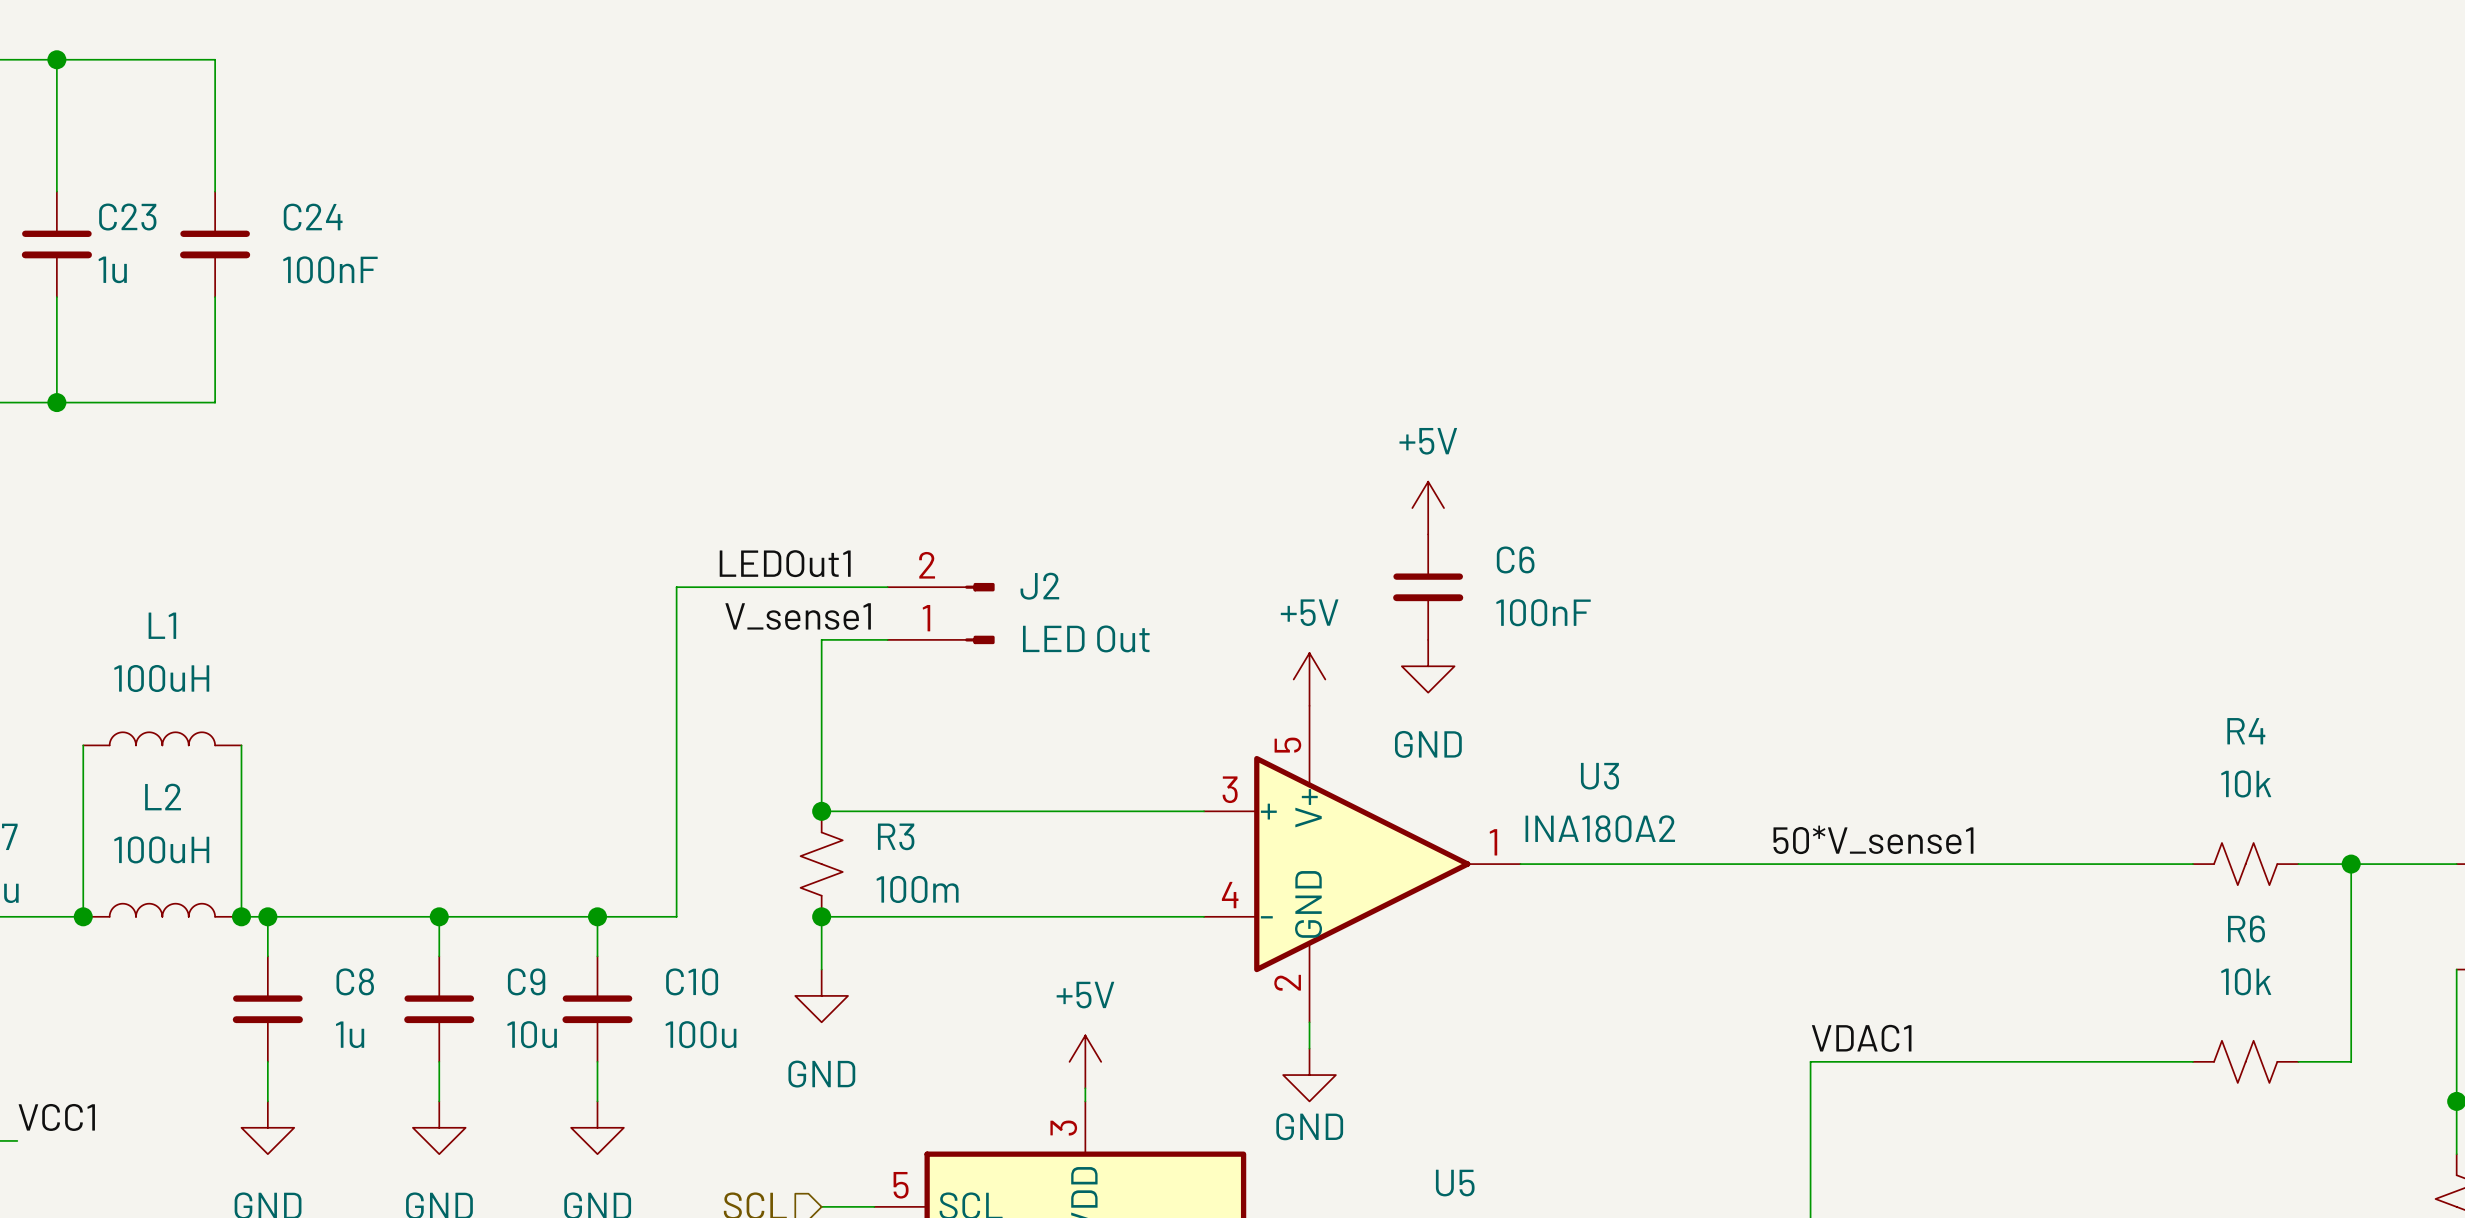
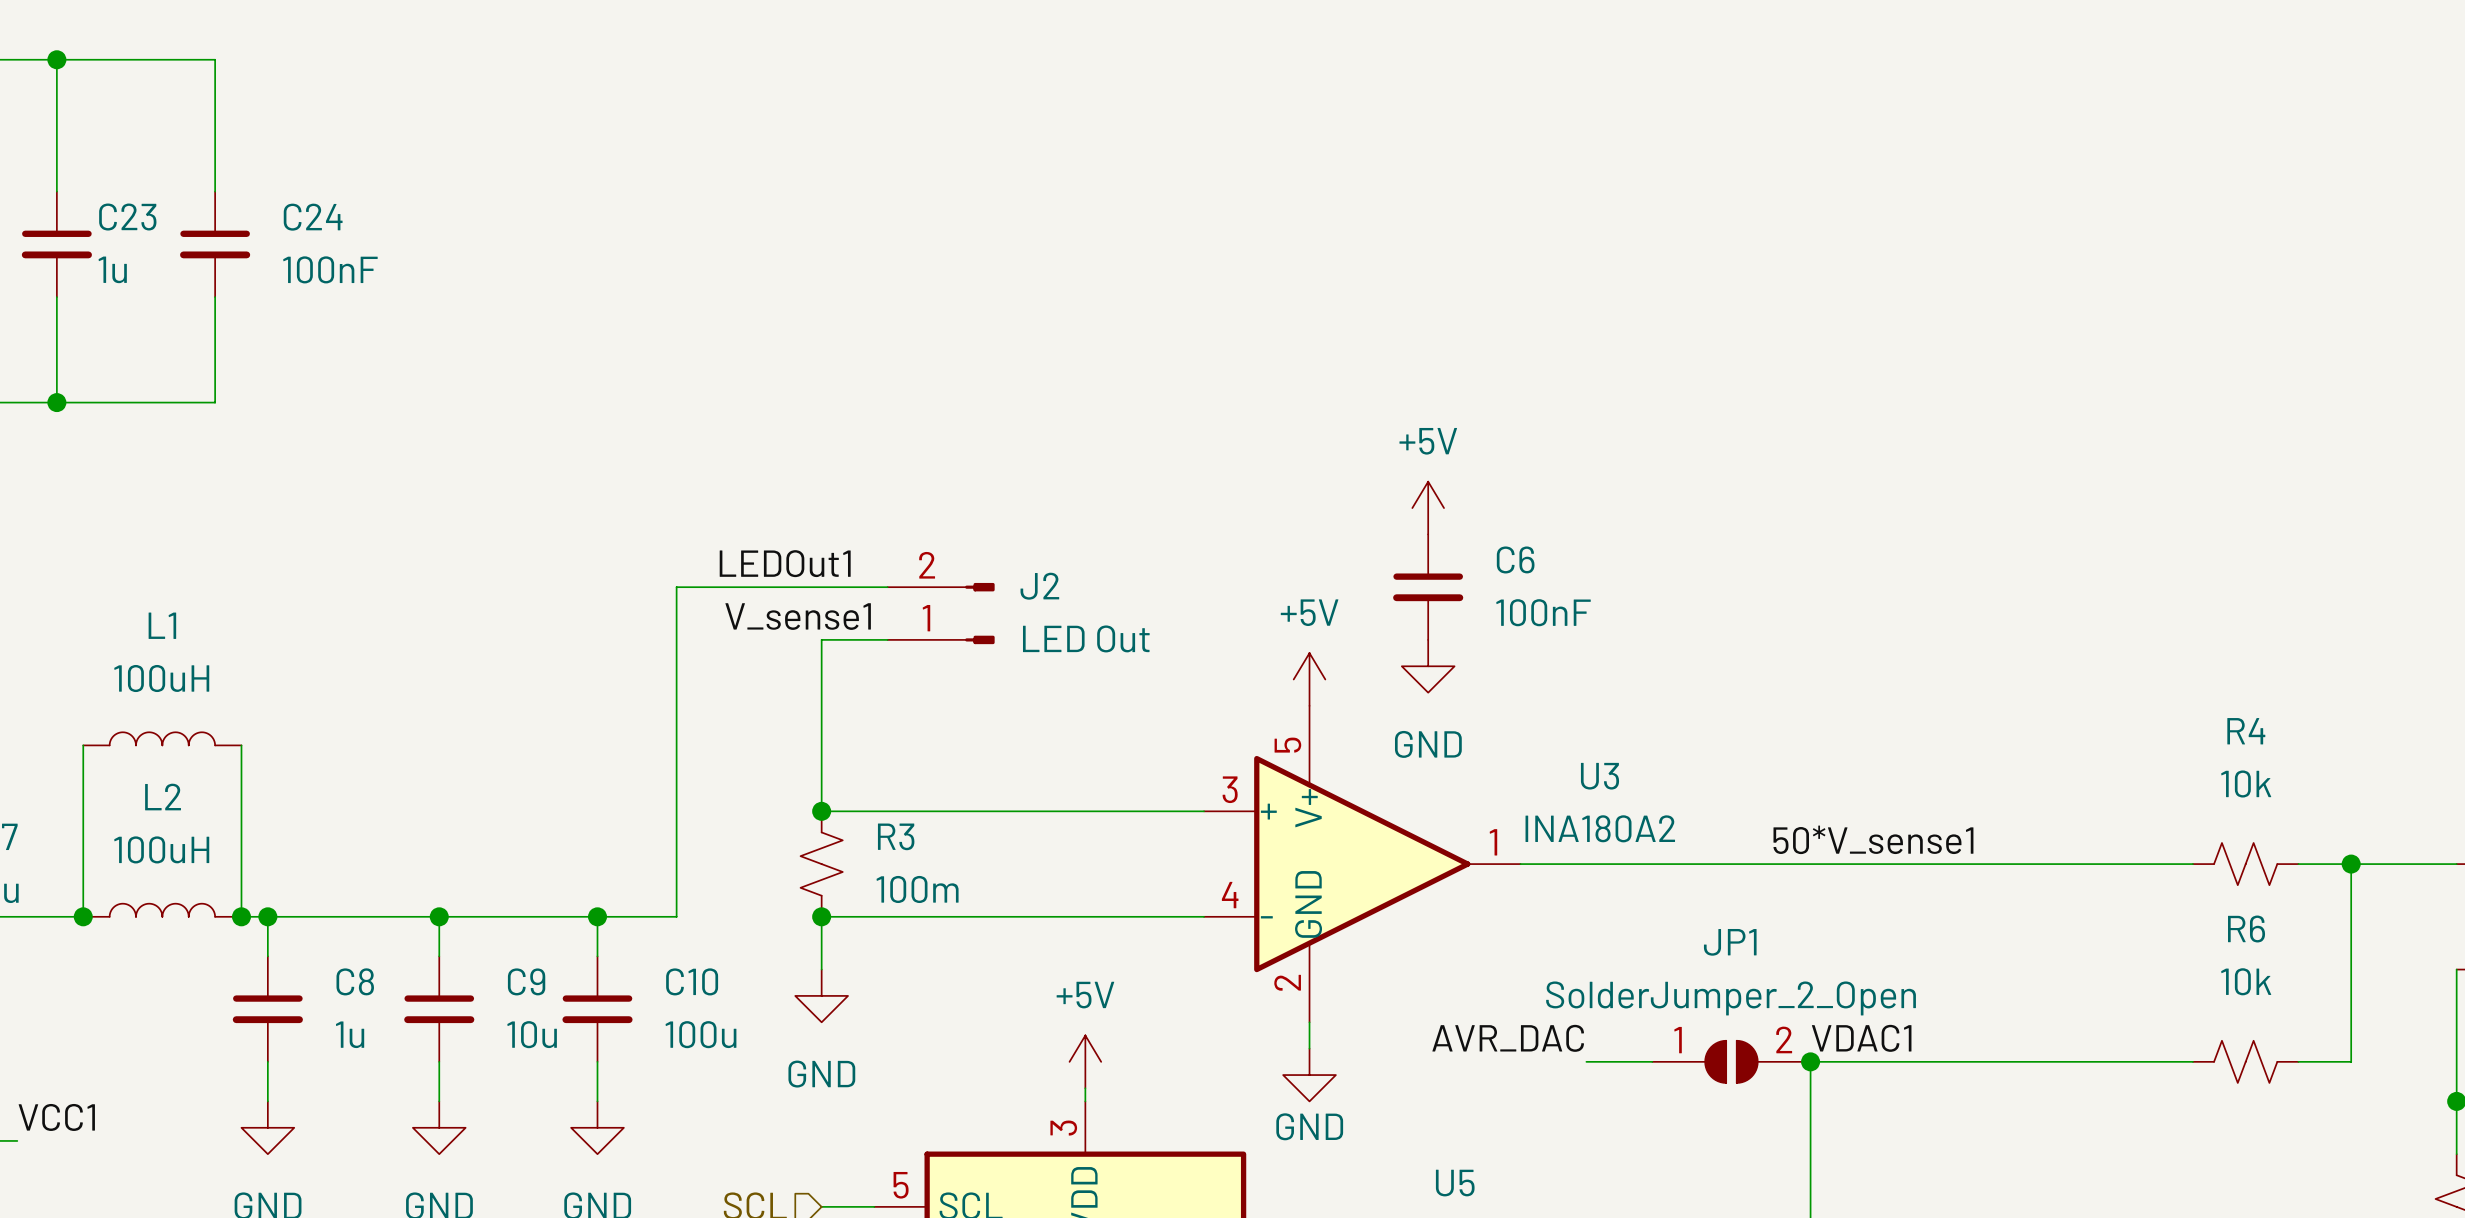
label: none -> AVR_DAC (1508, 1038)
wire: none -> (1586, 1061) (1652, 1061)
JP1: none -> SolderJumper_2_Open (1731, 1061)
junction: none -> (1810, 1061)

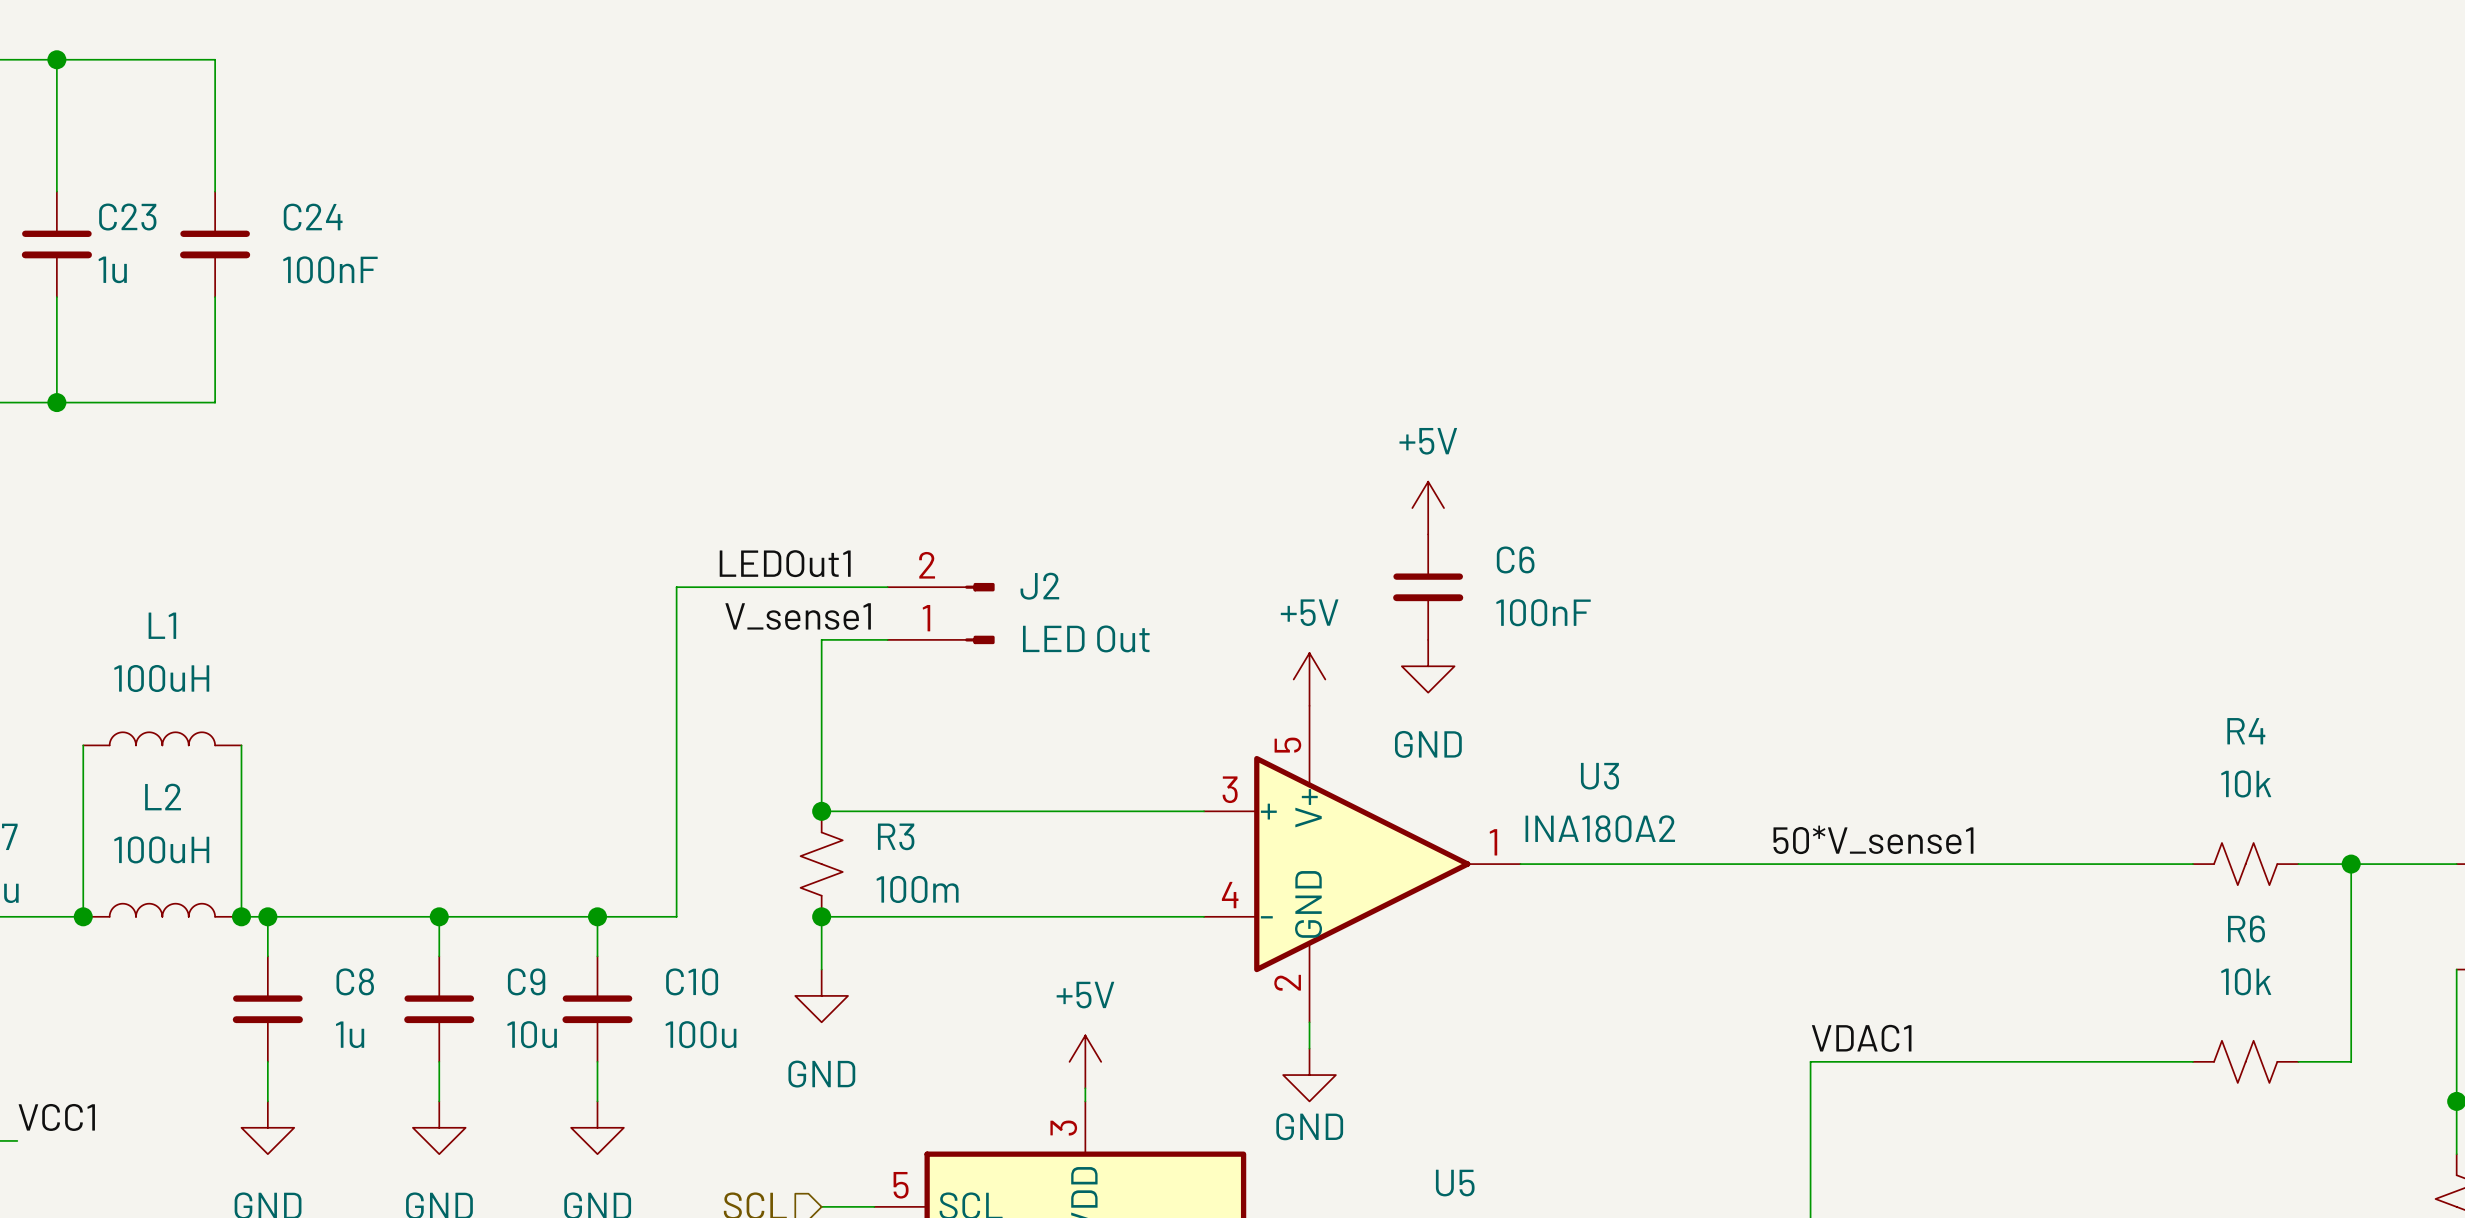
label: AVR_DAC (1508, 1038) -> none
wire: (1586, 1061) (1652, 1061) -> none
JP1: SolderJumper_2_Open (1731, 1061) -> none
junction: (1810, 1061) -> none

